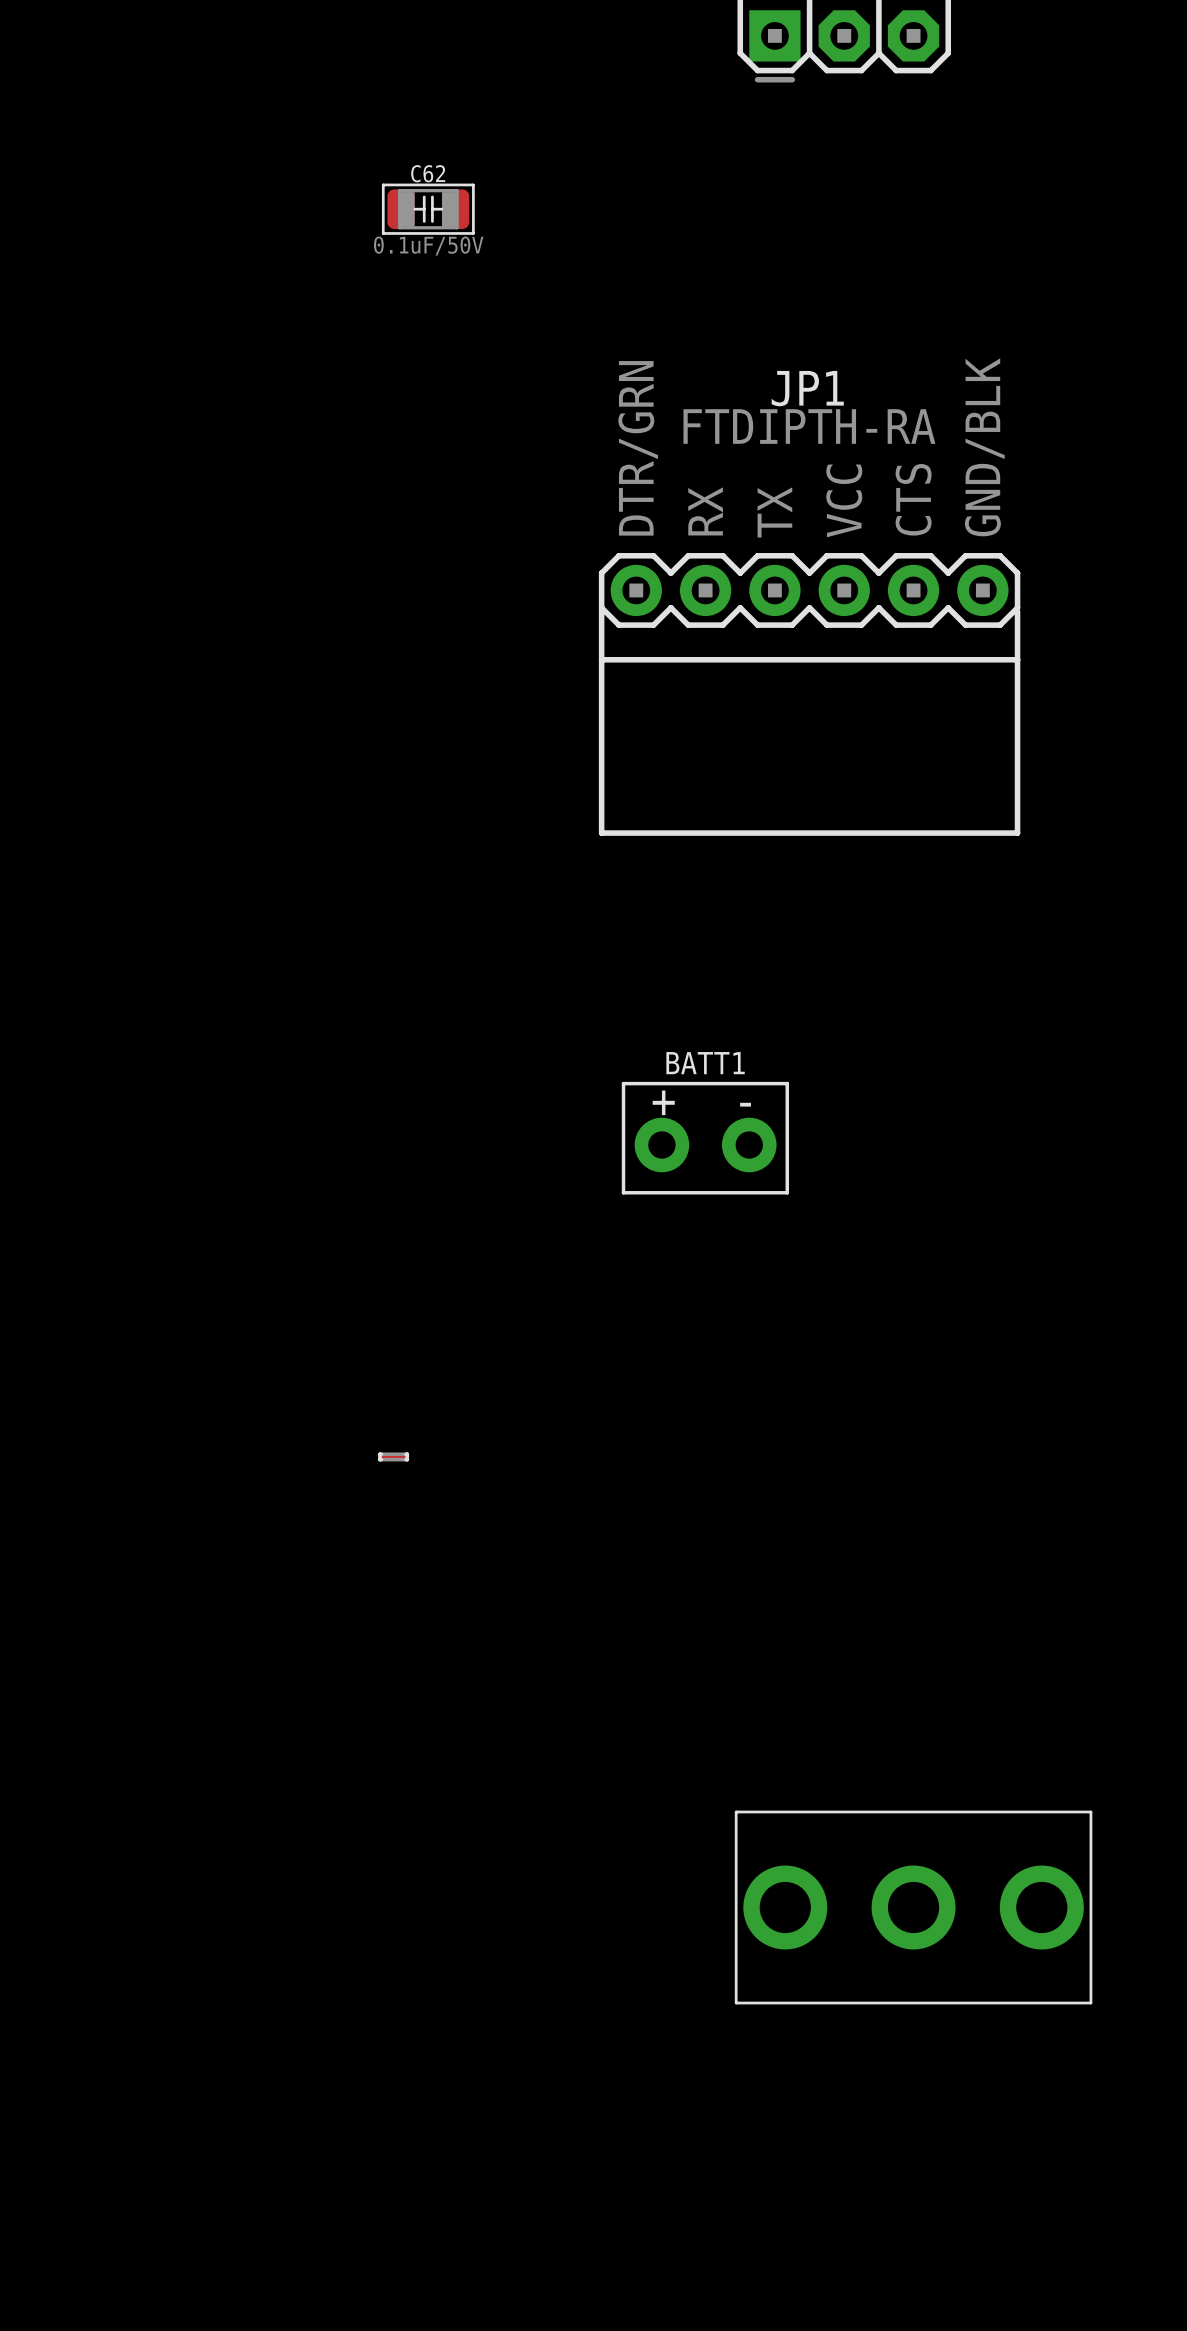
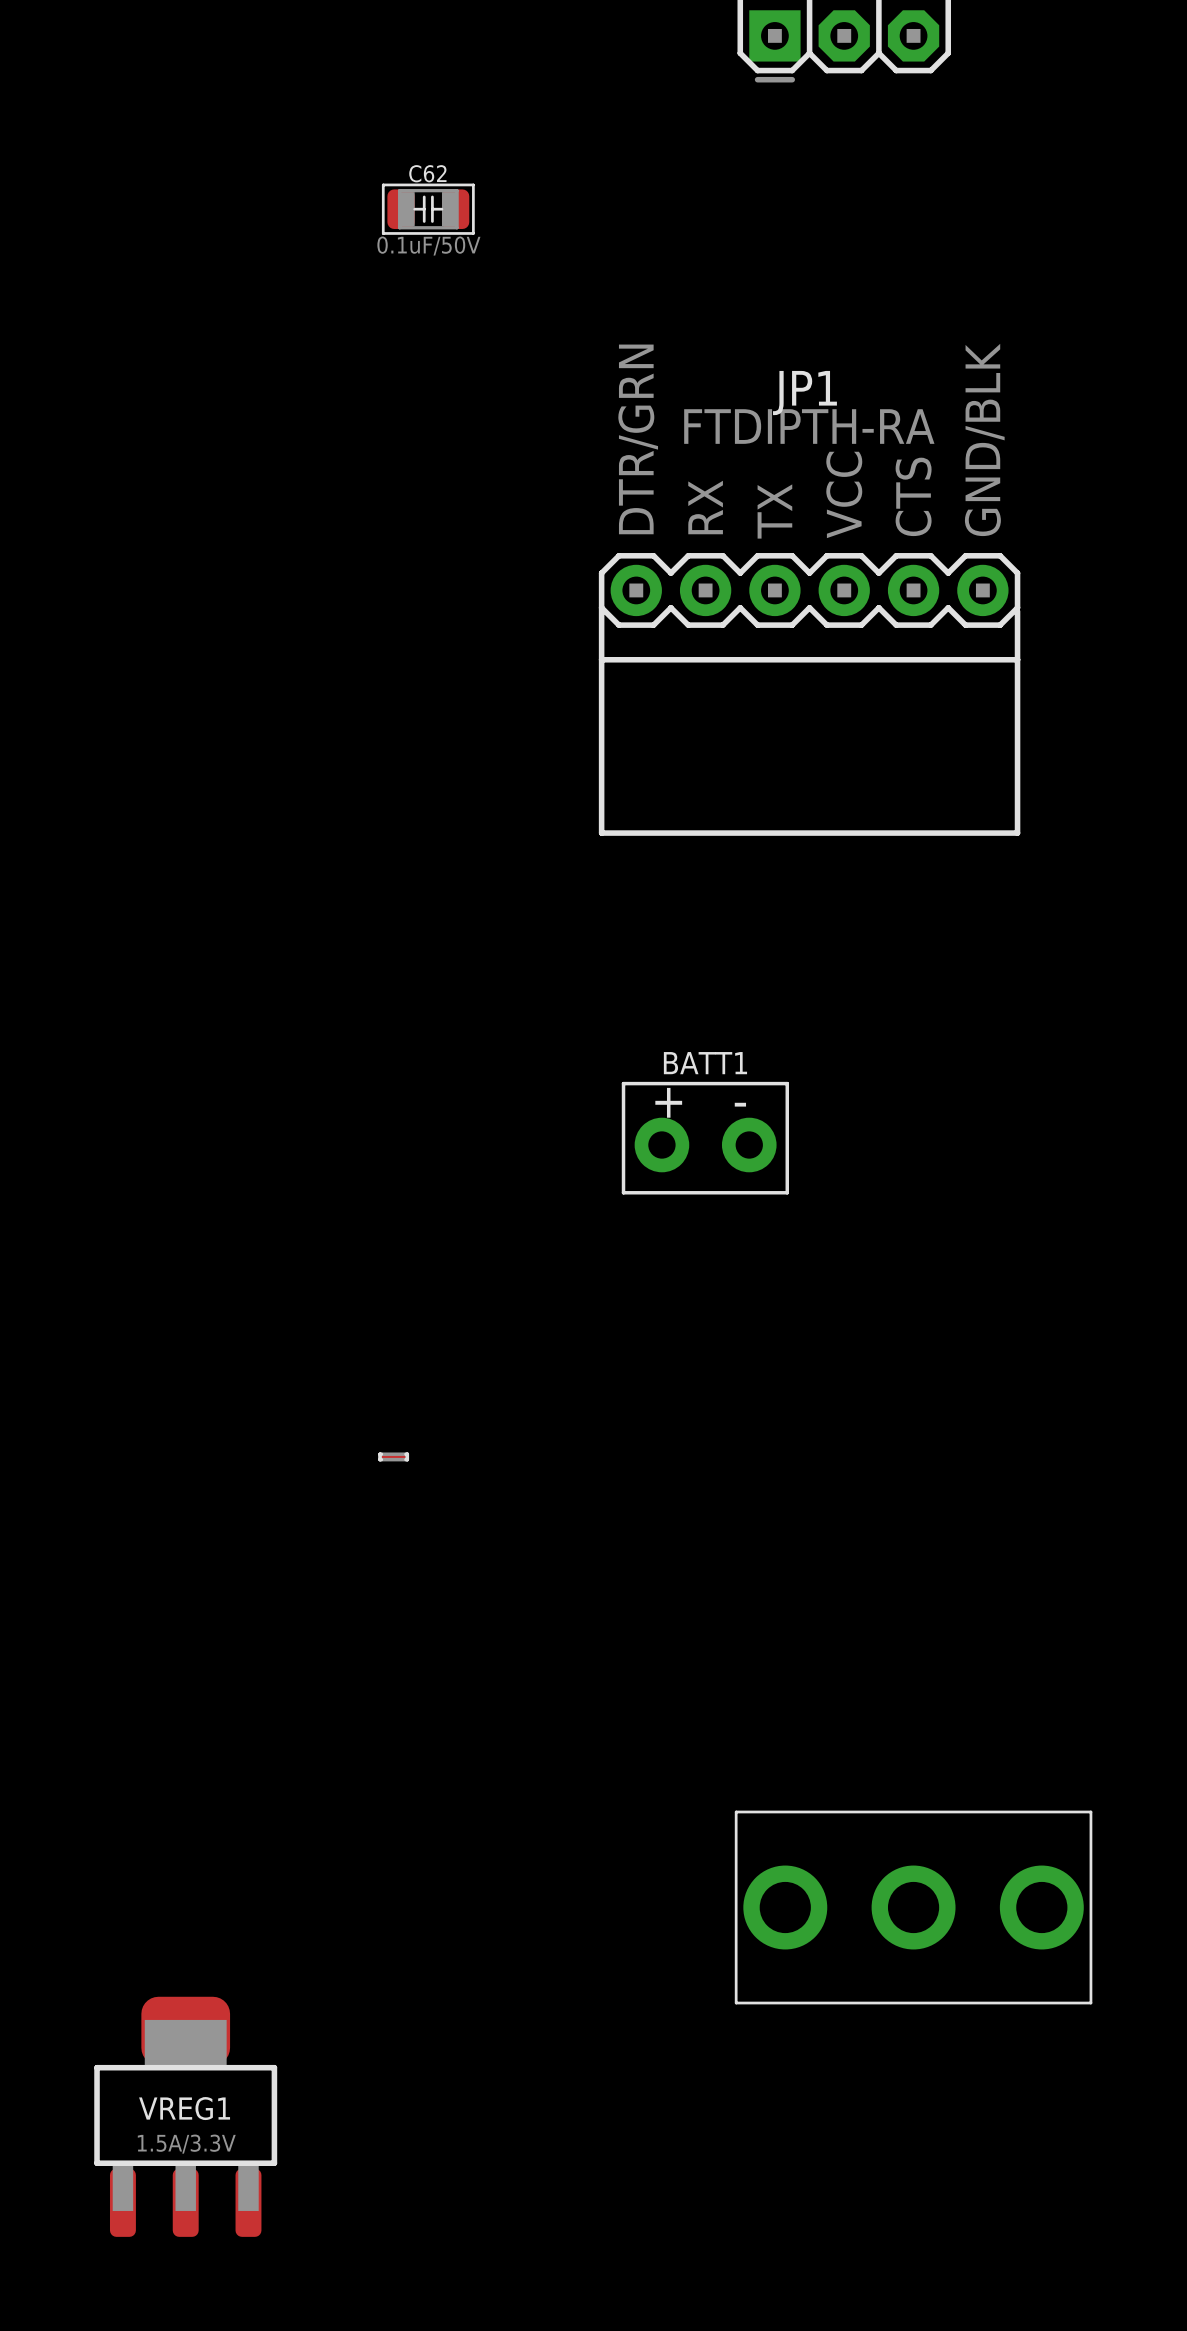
VREG1: none -> 1.5A/3.3V (185, 2116)

